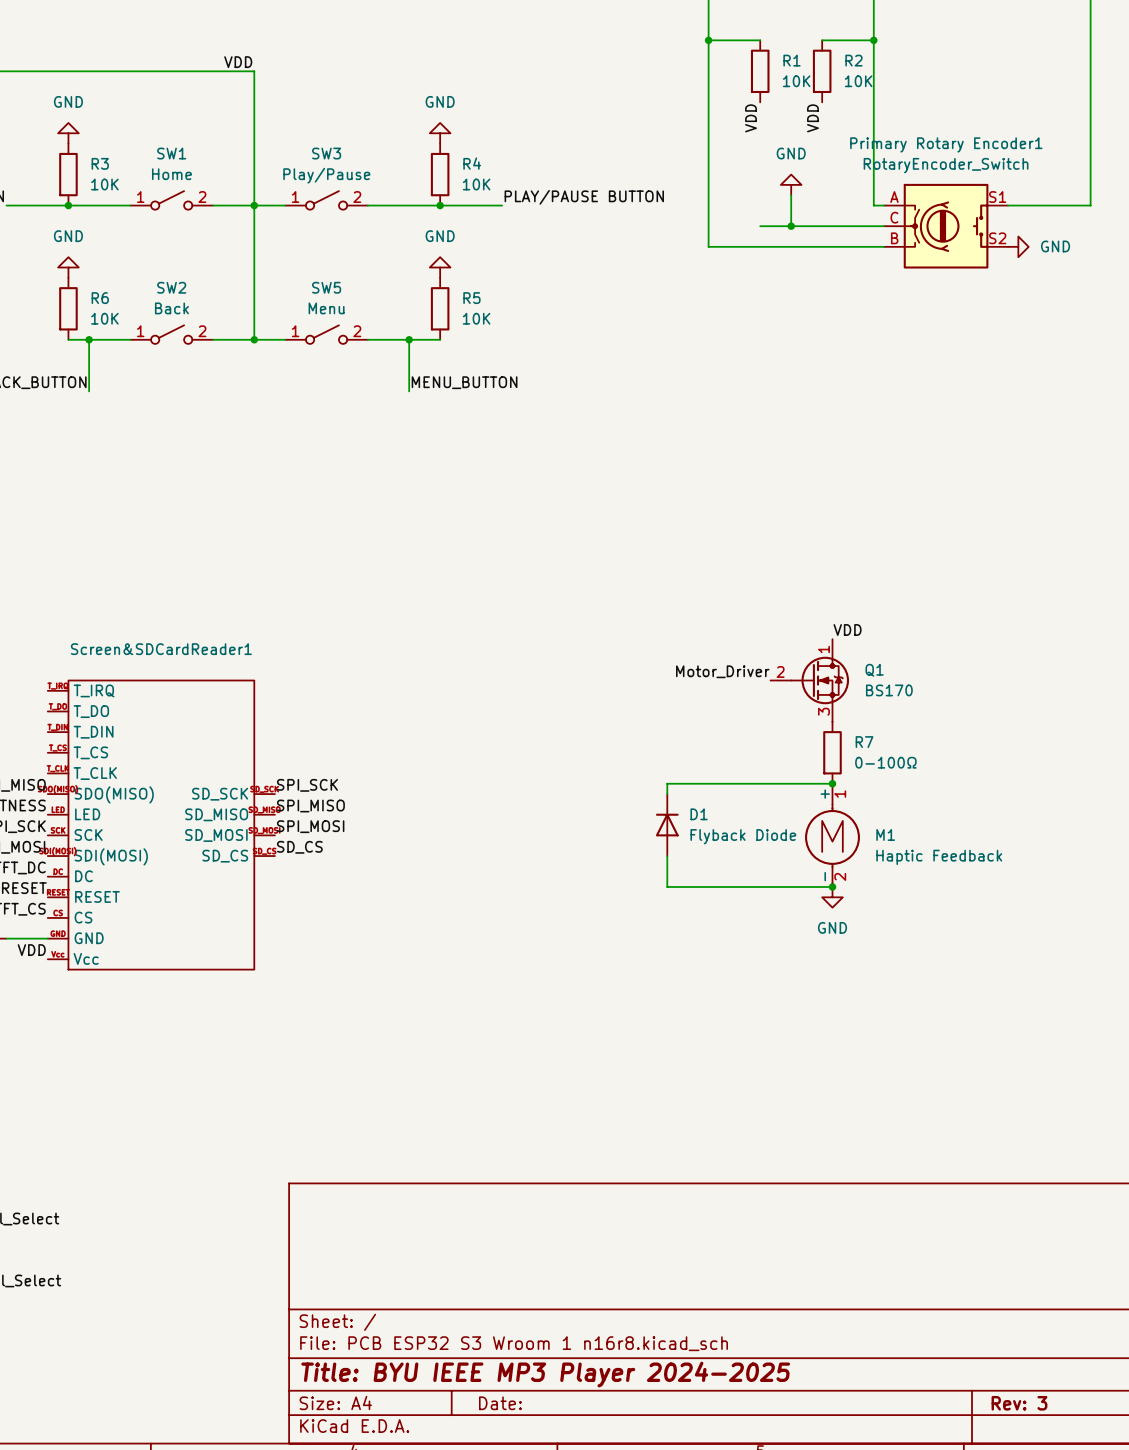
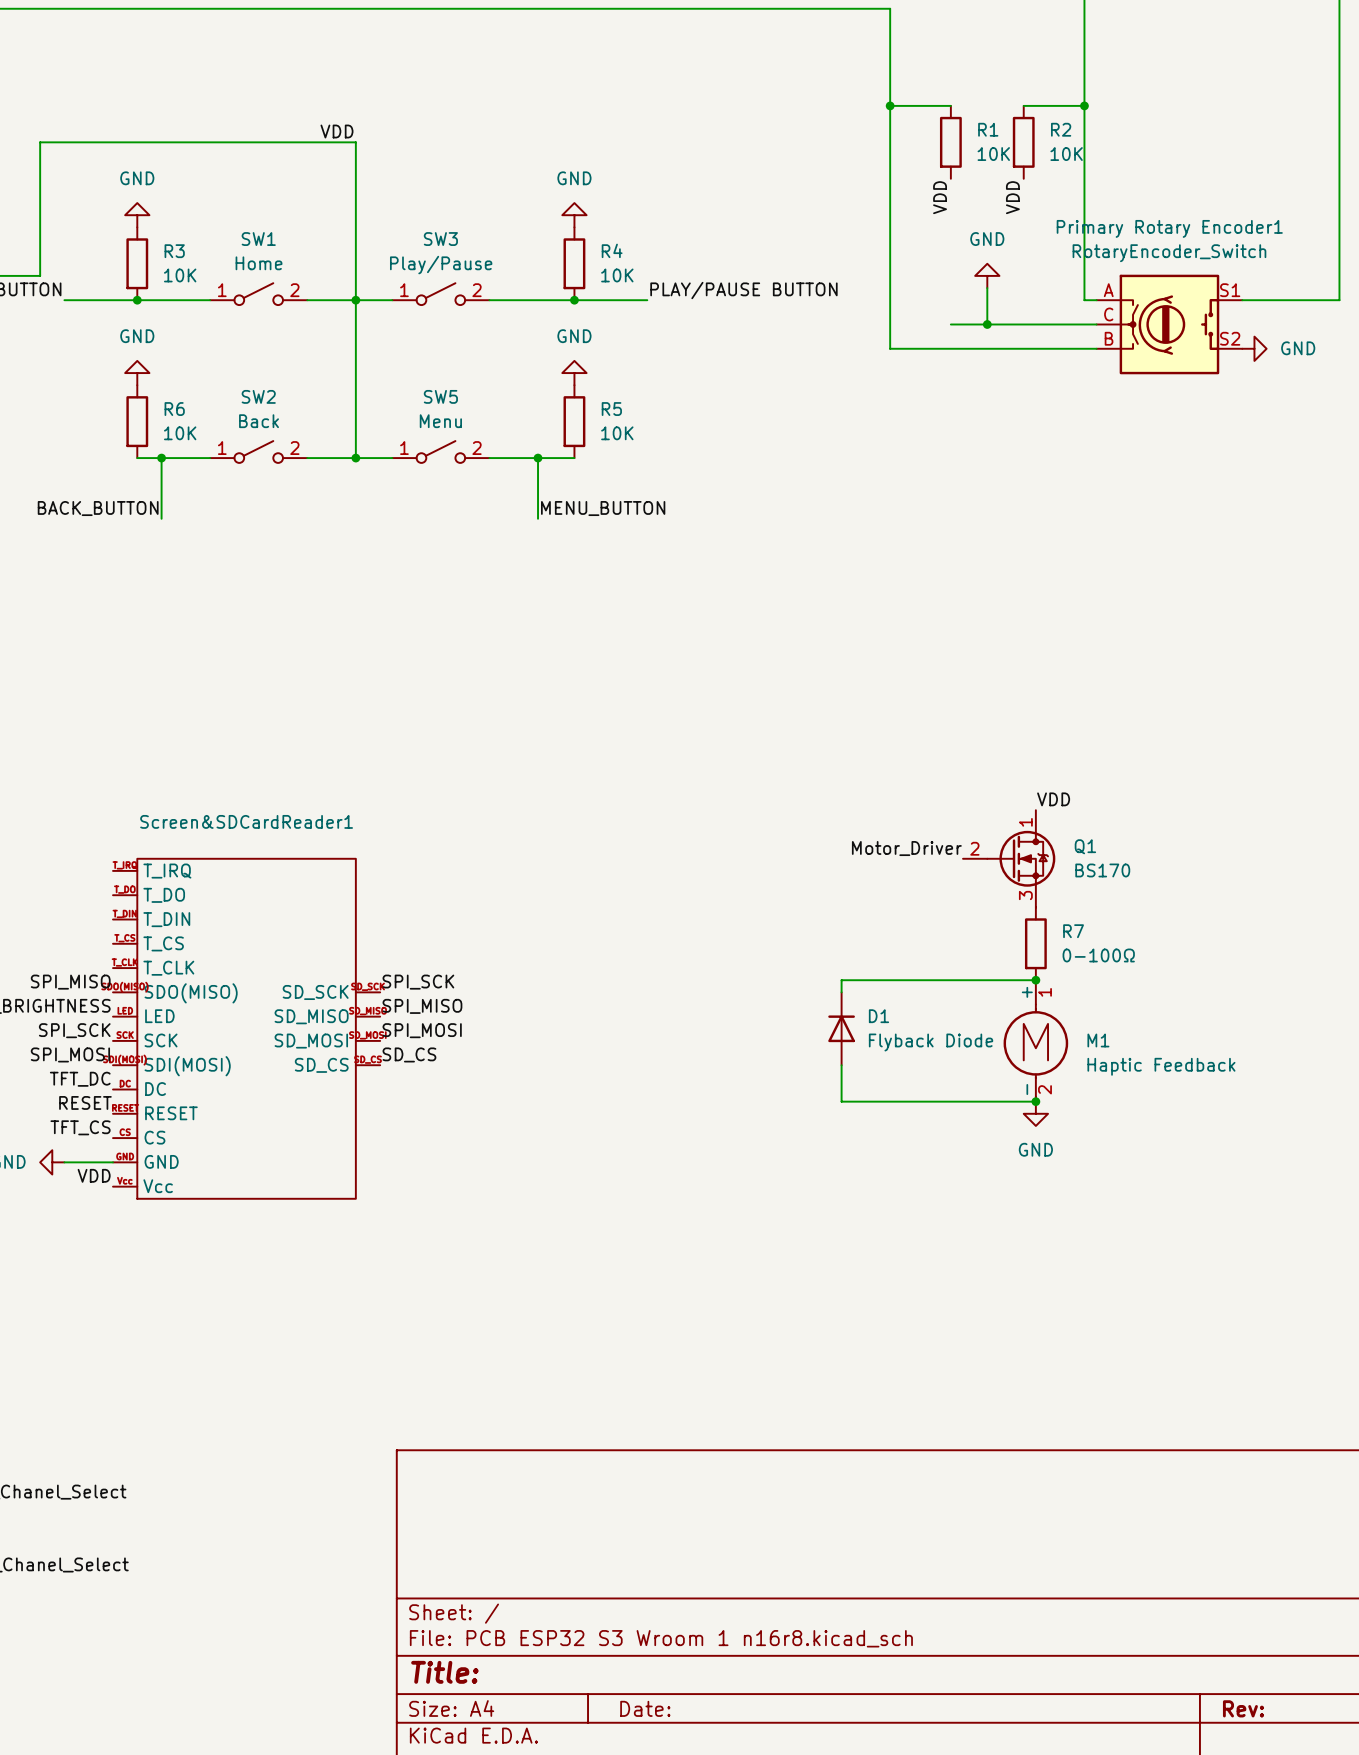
title block: Title: BYU IEEE MP3 Player 2024-2025 (545, 1374) -> Title: (444, 1672)
title block: Rev: 3 (1019, 1403) -> Rev: (1243, 1708)

